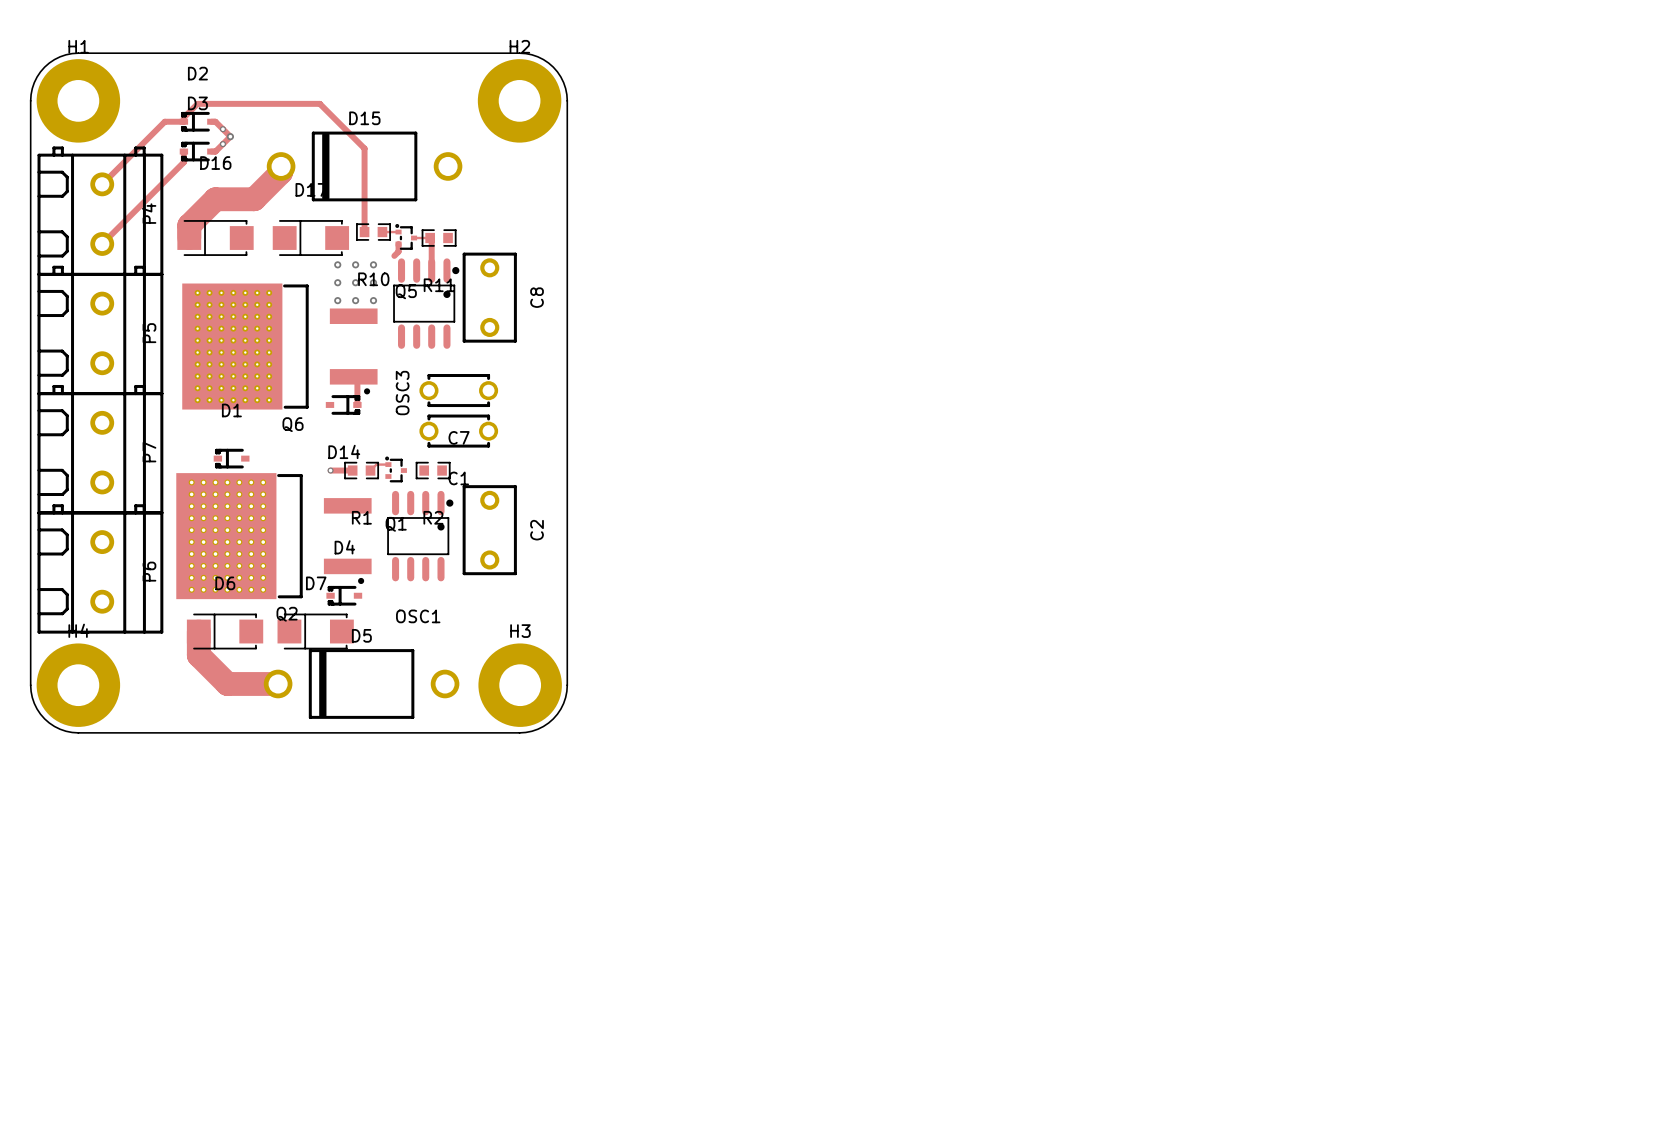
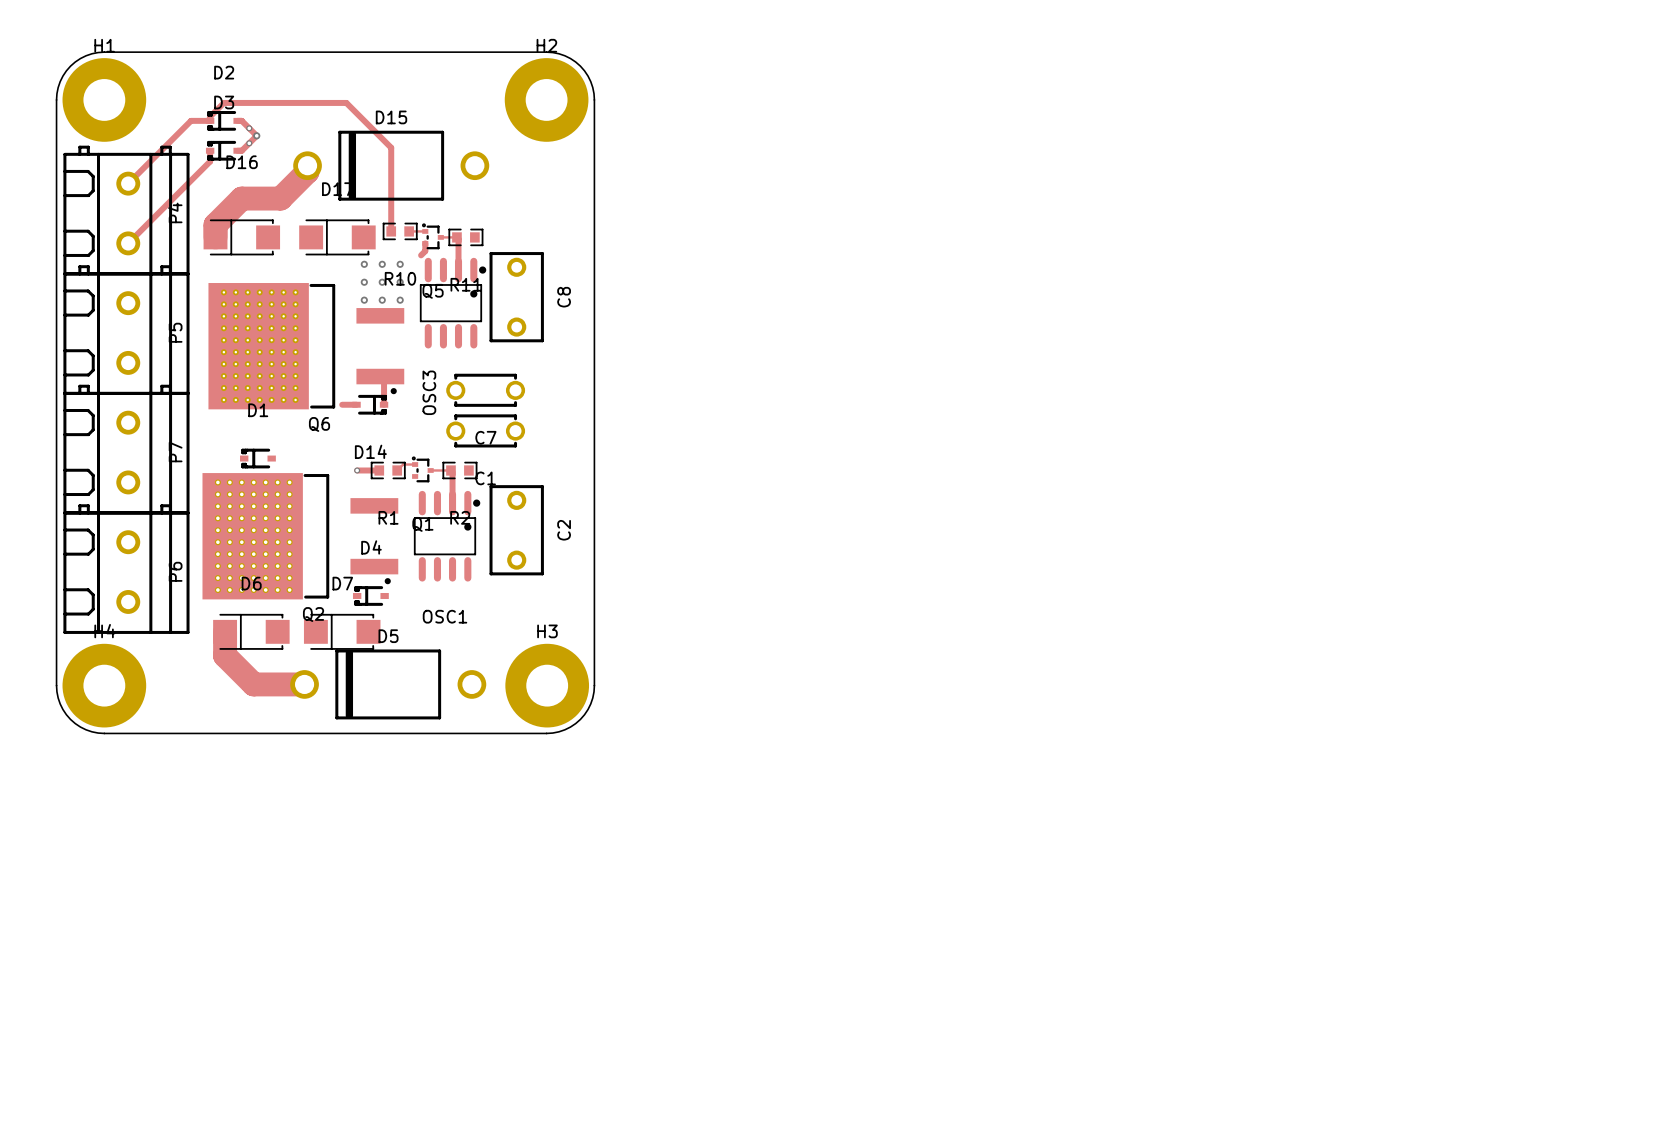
track: none -> (342, 404) (356, 404)
track: none -> (430, 470) (452, 472) (452, 503)

